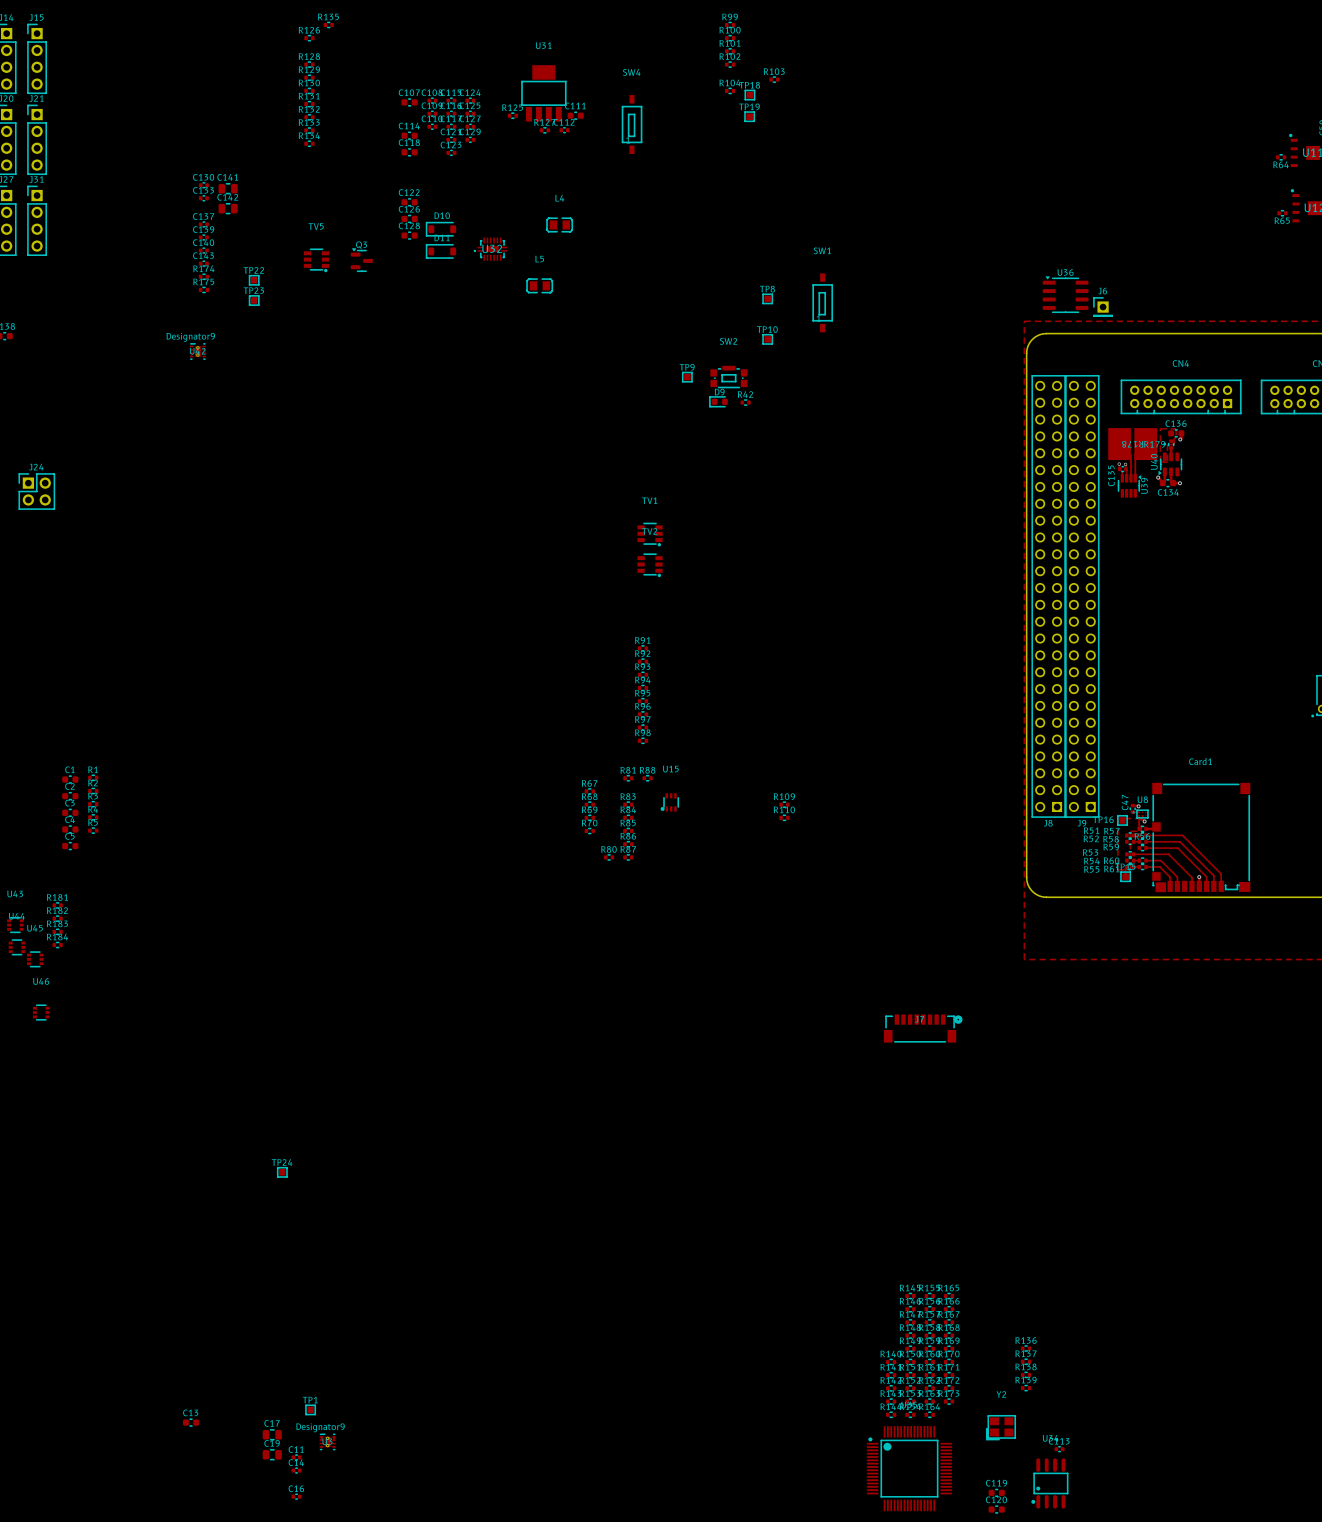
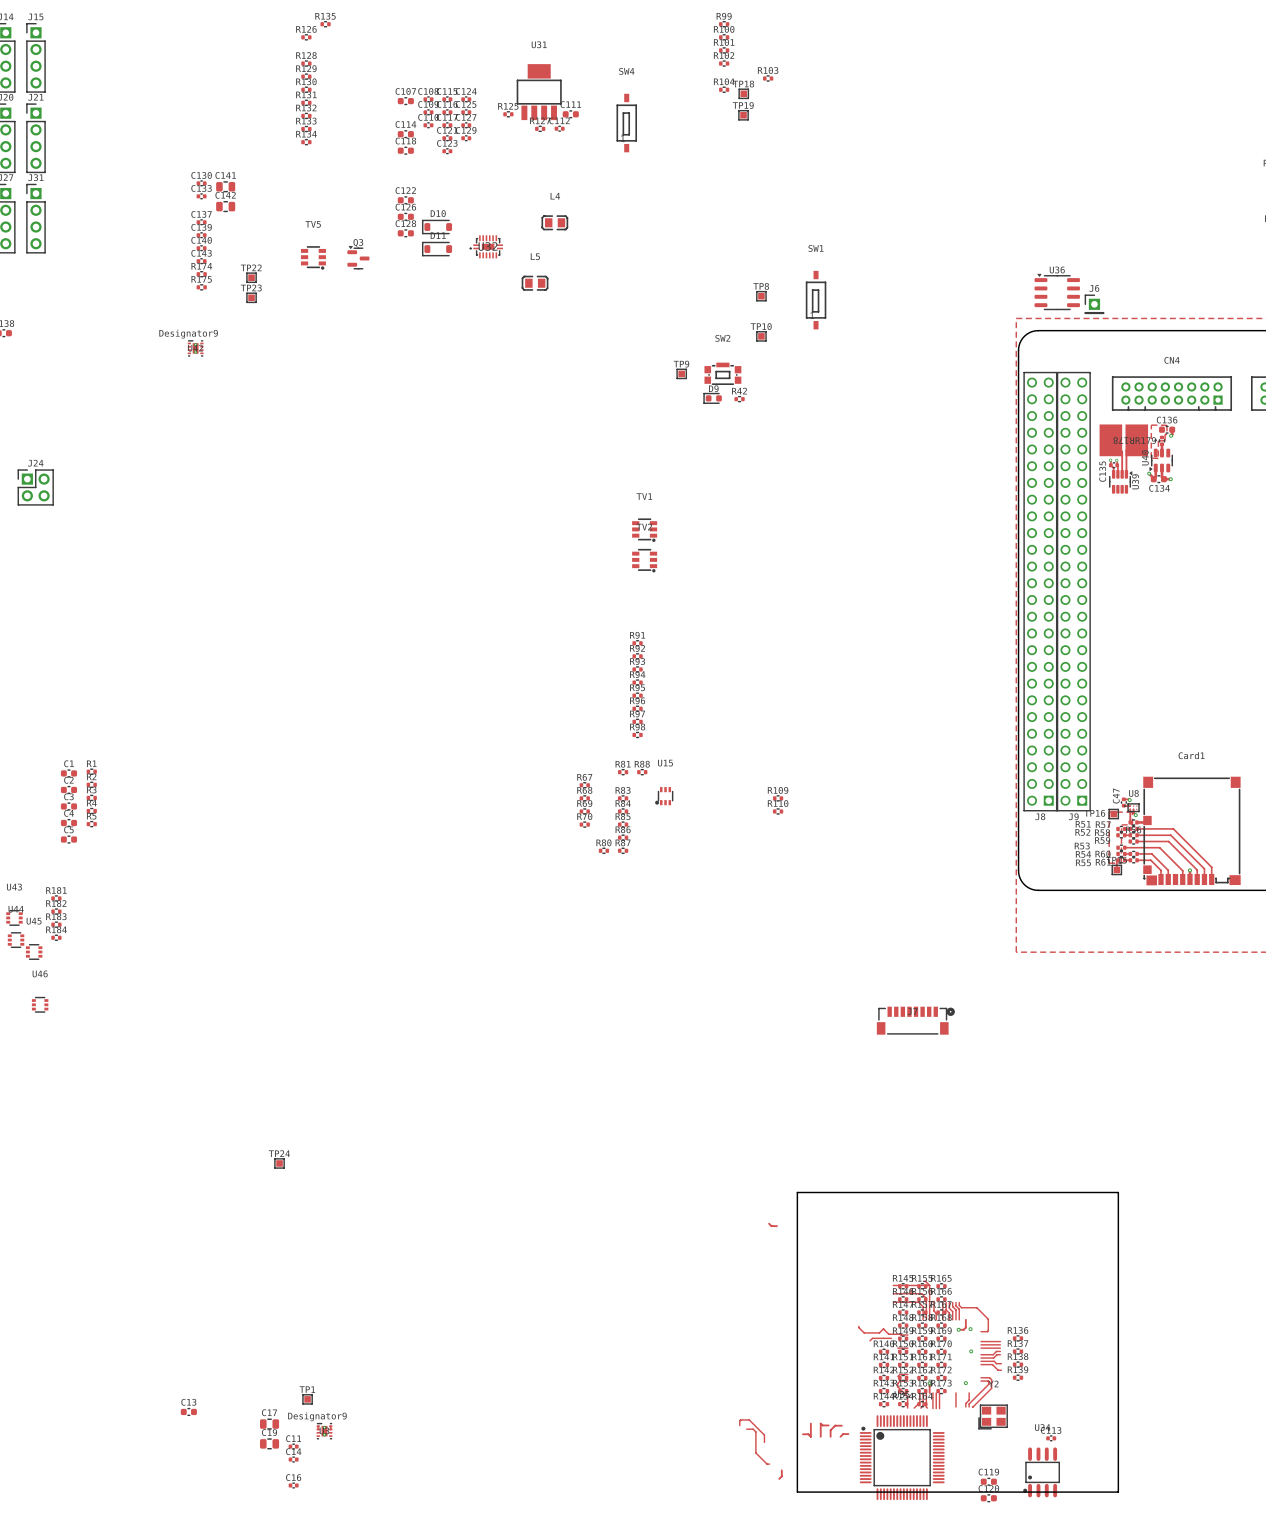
board edge: none -> (797, 1192) (1118, 1192) (1118, 1492) (797, 1492) (797, 1192)
track: none -> (769, 1223) (771, 1226) (776, 1226)
track: none -> (923, 1281) (929, 1285)
track: none -> (893, 1285) (929, 1285)
track: none -> (929, 1285) (929, 1319)
track: none -> (911, 1289) (911, 1293)
track: none -> (893, 1293) (921, 1293) (926, 1298) (926, 1319)
track: none -> (933, 1301) (936, 1319)
track: none -> (893, 1302) (918, 1302) (923, 1306) (923, 1319)
track: none -> (942, 1302) (942, 1319)
track: none -> (946, 1302) (949, 1319)
track: none -> (949, 1302) (949, 1308) (952, 1311) (952, 1319)
track: none -> (952, 1302) (952, 1306) (955, 1309) (955, 1319)
track: none -> (955, 1302) (959, 1309) (959, 1319)
track: none -> (959, 1302) (961, 1307) (976, 1307) (988, 1319) (988, 1330) (981, 1331)
track: none -> (965, 1319) (965, 1327) (958, 1329)
track: none -> (858, 1326) (864, 1332) (879, 1332) (883, 1328) (888, 1334) (907, 1334)
via: none -> (958, 1329)
via: none -> (970, 1329)
track: none -> (891, 1338) (872, 1338) (870, 1340)
track: none -> (981, 1341) (1000, 1341)
track: none -> (981, 1344) (1000, 1344)
track: none -> (897, 1348) (907, 1348)
track: none -> (981, 1348) (1000, 1348)
via: none -> (971, 1351)
track: none -> (1000, 1351) (996, 1351) (993, 1354) (981, 1354)
track: none -> (1000, 1354) (993, 1358) (981, 1358)
track: none -> (981, 1361) (994, 1361) (996, 1363) (1001, 1363)
track: none -> (981, 1364) (992, 1364) (998, 1370) (1001, 1370)
track: none -> (907, 1374) (899, 1374) (897, 1376)
track: none -> (981, 1377) (989, 1377) (991, 1379) (991, 1388) (972, 1407)
track: none -> (907, 1381) (900, 1381) (897, 1383) (897, 1386) (907, 1396) (907, 1408)
track: none -> (981, 1381) (988, 1381) (988, 1384) (969, 1403) (969, 1407)
track: none -> (929, 1383) (929, 1392)
via: none -> (929, 1383)
via: none -> (965, 1383)
track: none -> (919, 1392) (919, 1402) (914, 1408)
track: none -> (923, 1392) (923, 1405) (920, 1408)
track: none -> (926, 1392) (927, 1408)
track: none -> (932, 1392) (932, 1408)
track: none -> (936, 1392) (936, 1408)
track: none -> (939, 1392) (939, 1408)
track: none -> (955, 1392) (955, 1407)
track: none -> (969, 1392) (969, 1400) (965, 1403) (965, 1407)
track: none -> (810, 1423) (810, 1436) (808, 1434) (802, 1434)
track: none -> (739, 1425) (740, 1419) (749, 1419) (764, 1435) (764, 1442)
track: none -> (828, 1425) (820, 1423) (820, 1436)
track: none -> (835, 1425) (830, 1430) (830, 1436)
track: none -> (835, 1425) (841, 1425)
track: none -> (746, 1429) (753, 1429) (755, 1431) (755, 1452) (767, 1464) (769, 1464)
track: none -> (848, 1434) (843, 1434) (840, 1436)
track: none -> (781, 1470) (781, 1476) (779, 1478)

